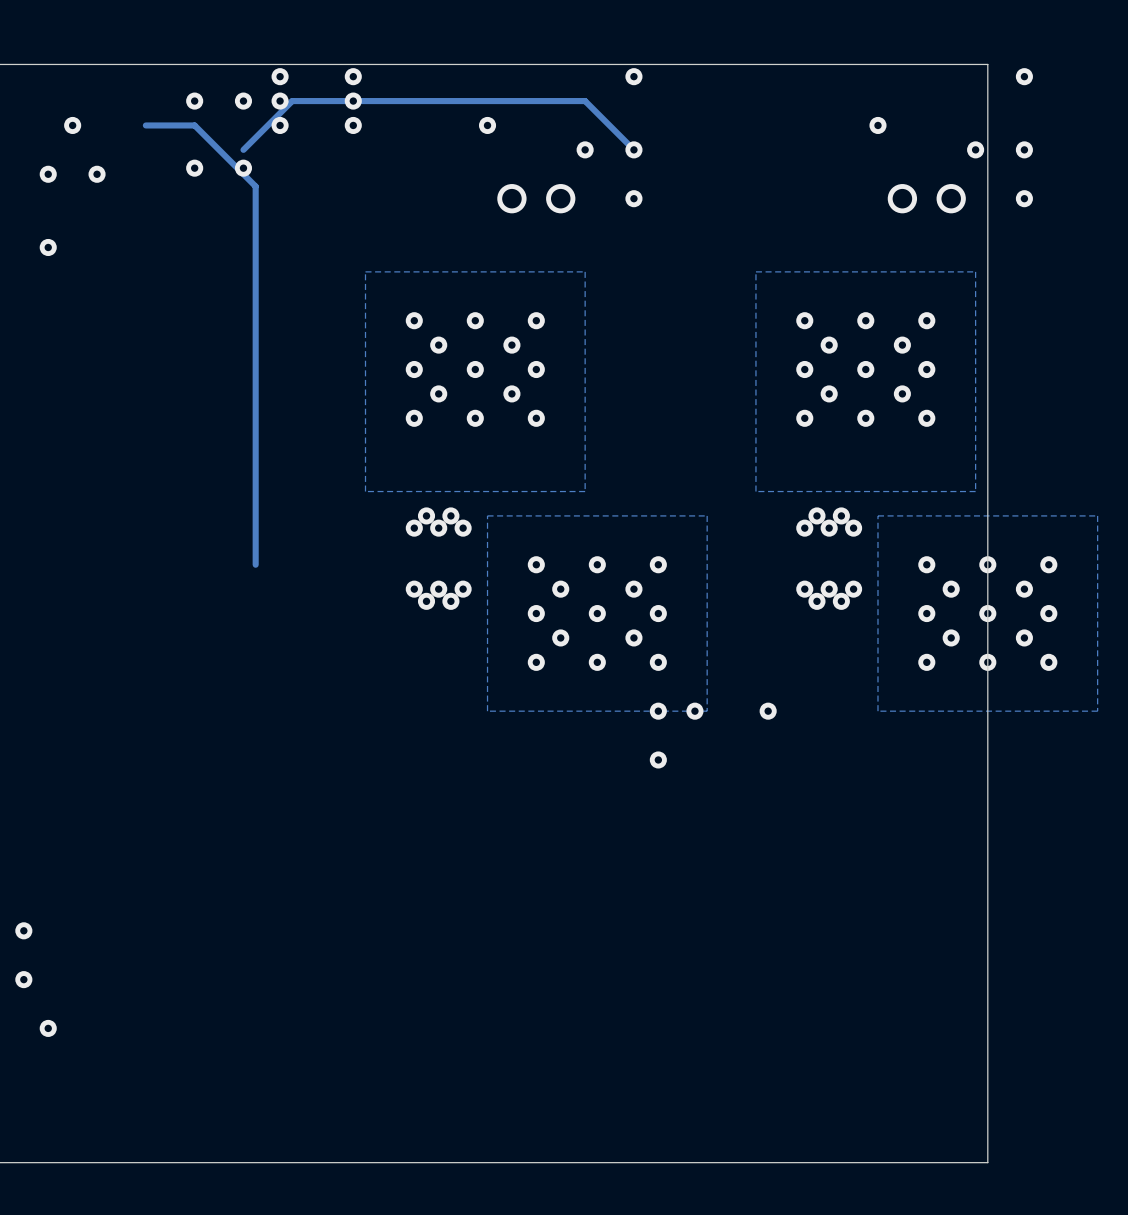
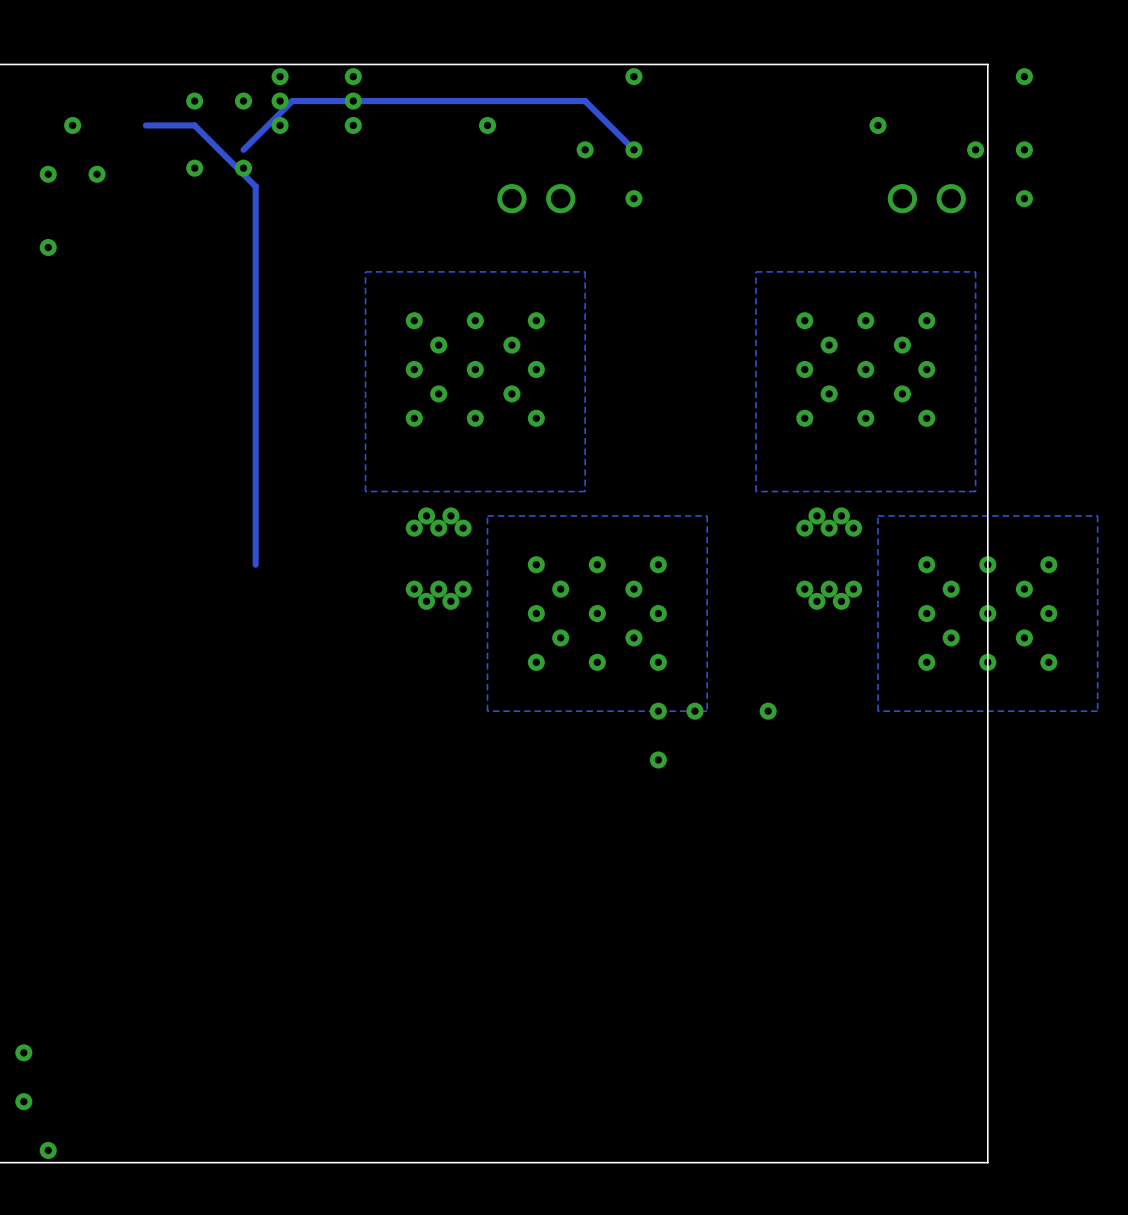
via: (23, 930) -> none
via: (23, 979) -> none
via position: (48, 1028) -> (23, 1052)
via: none -> (23, 1101)
via: none -> (48, 1150)

